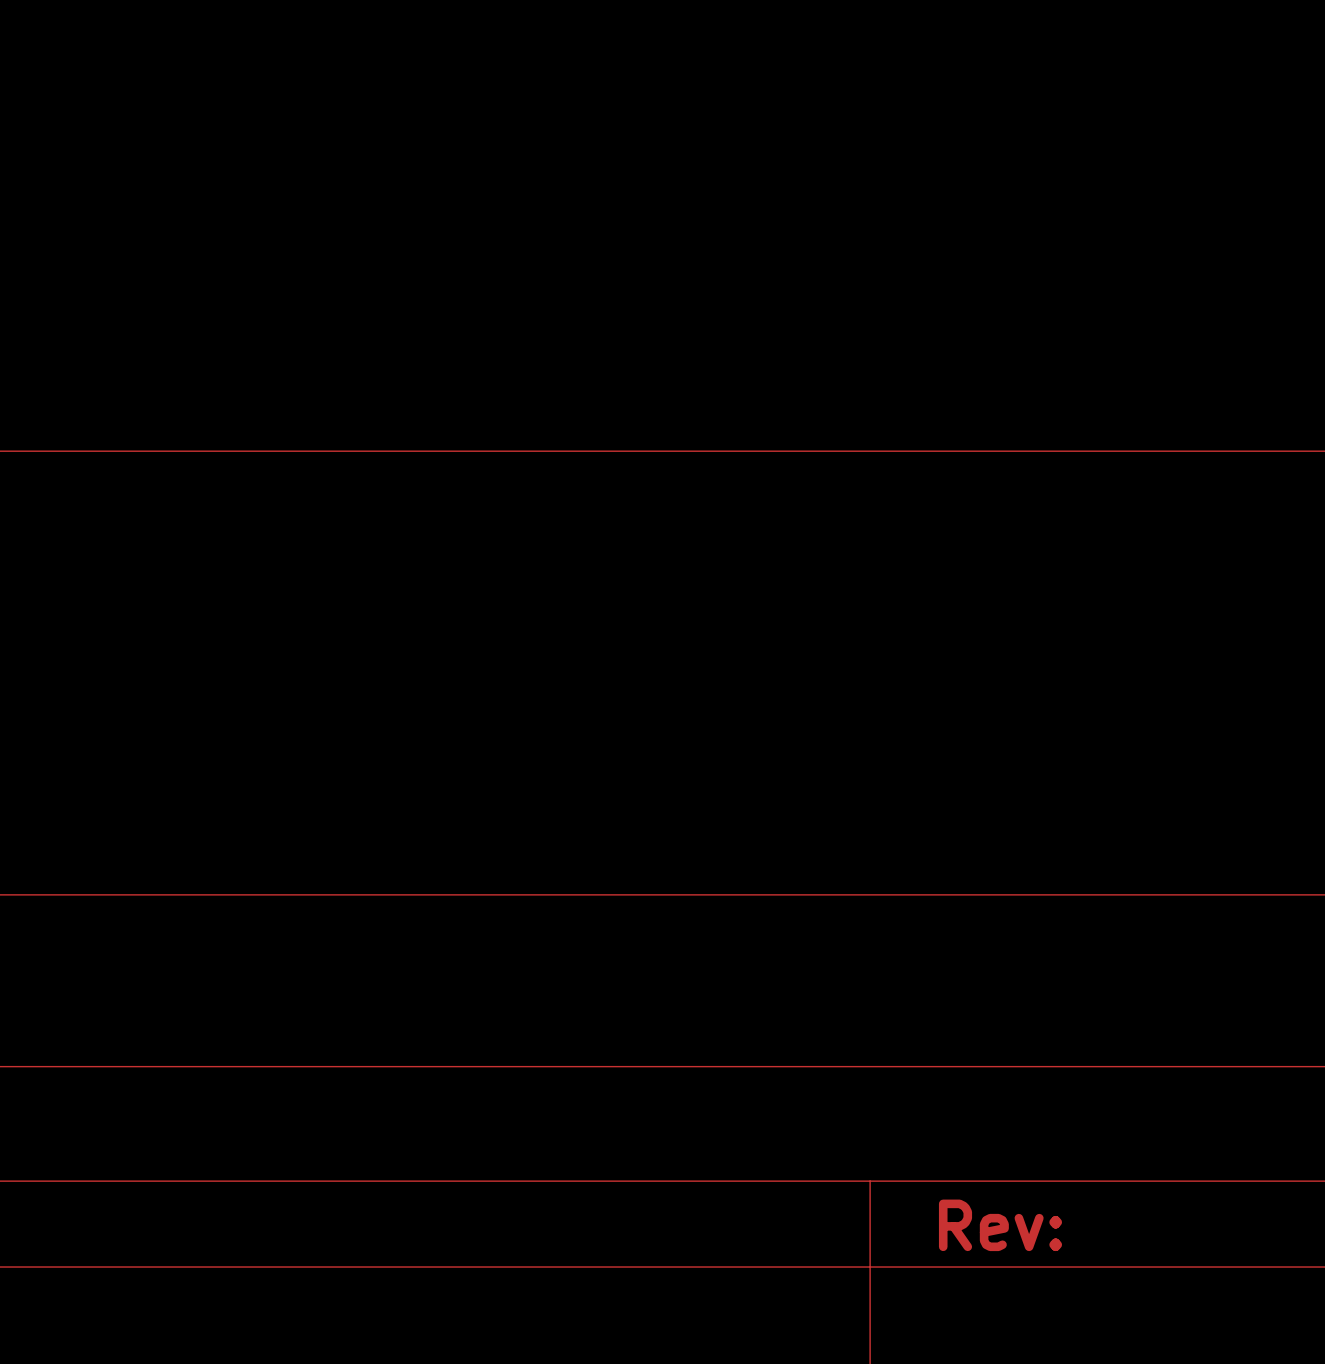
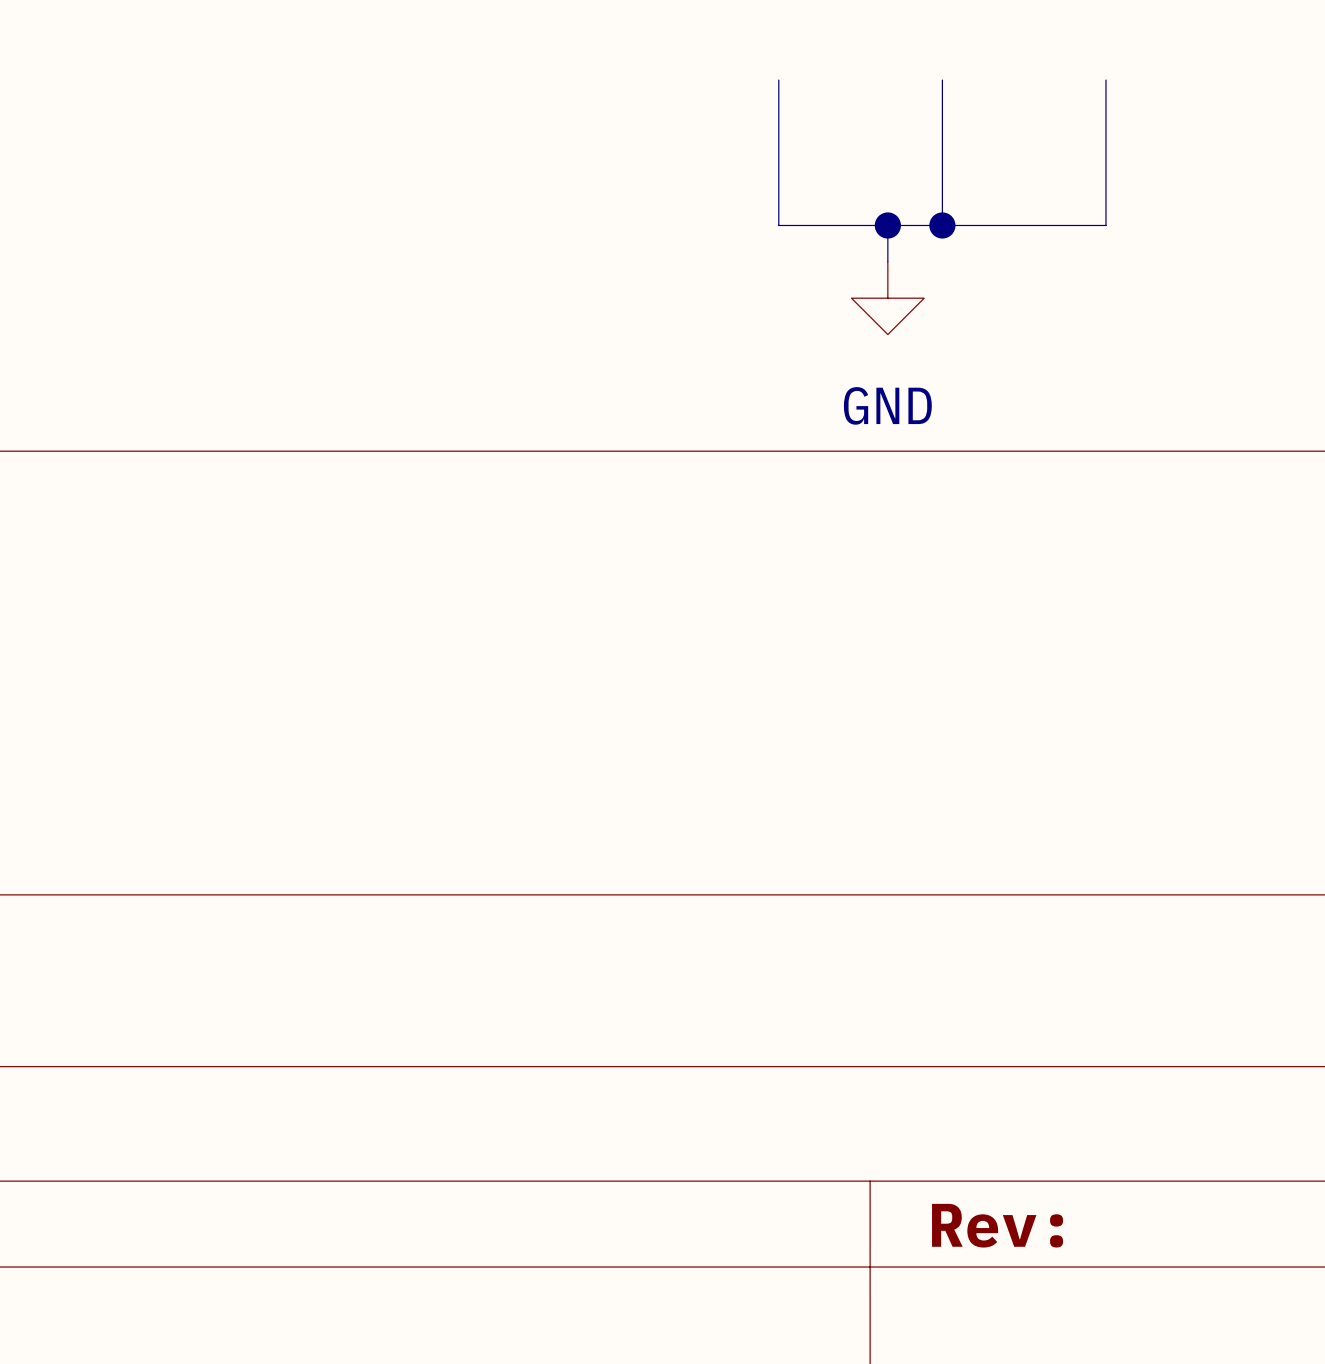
wire: none -> (778, 80) (778, 225) (1105, 225) (1105, 80)
wire: none -> (942, 80) (942, 225)
wire: none -> (887, 225) (887, 261)
junction: none -> (887, 225)
junction: none -> (942, 225)
power symbol: none -> GND (887, 298)

